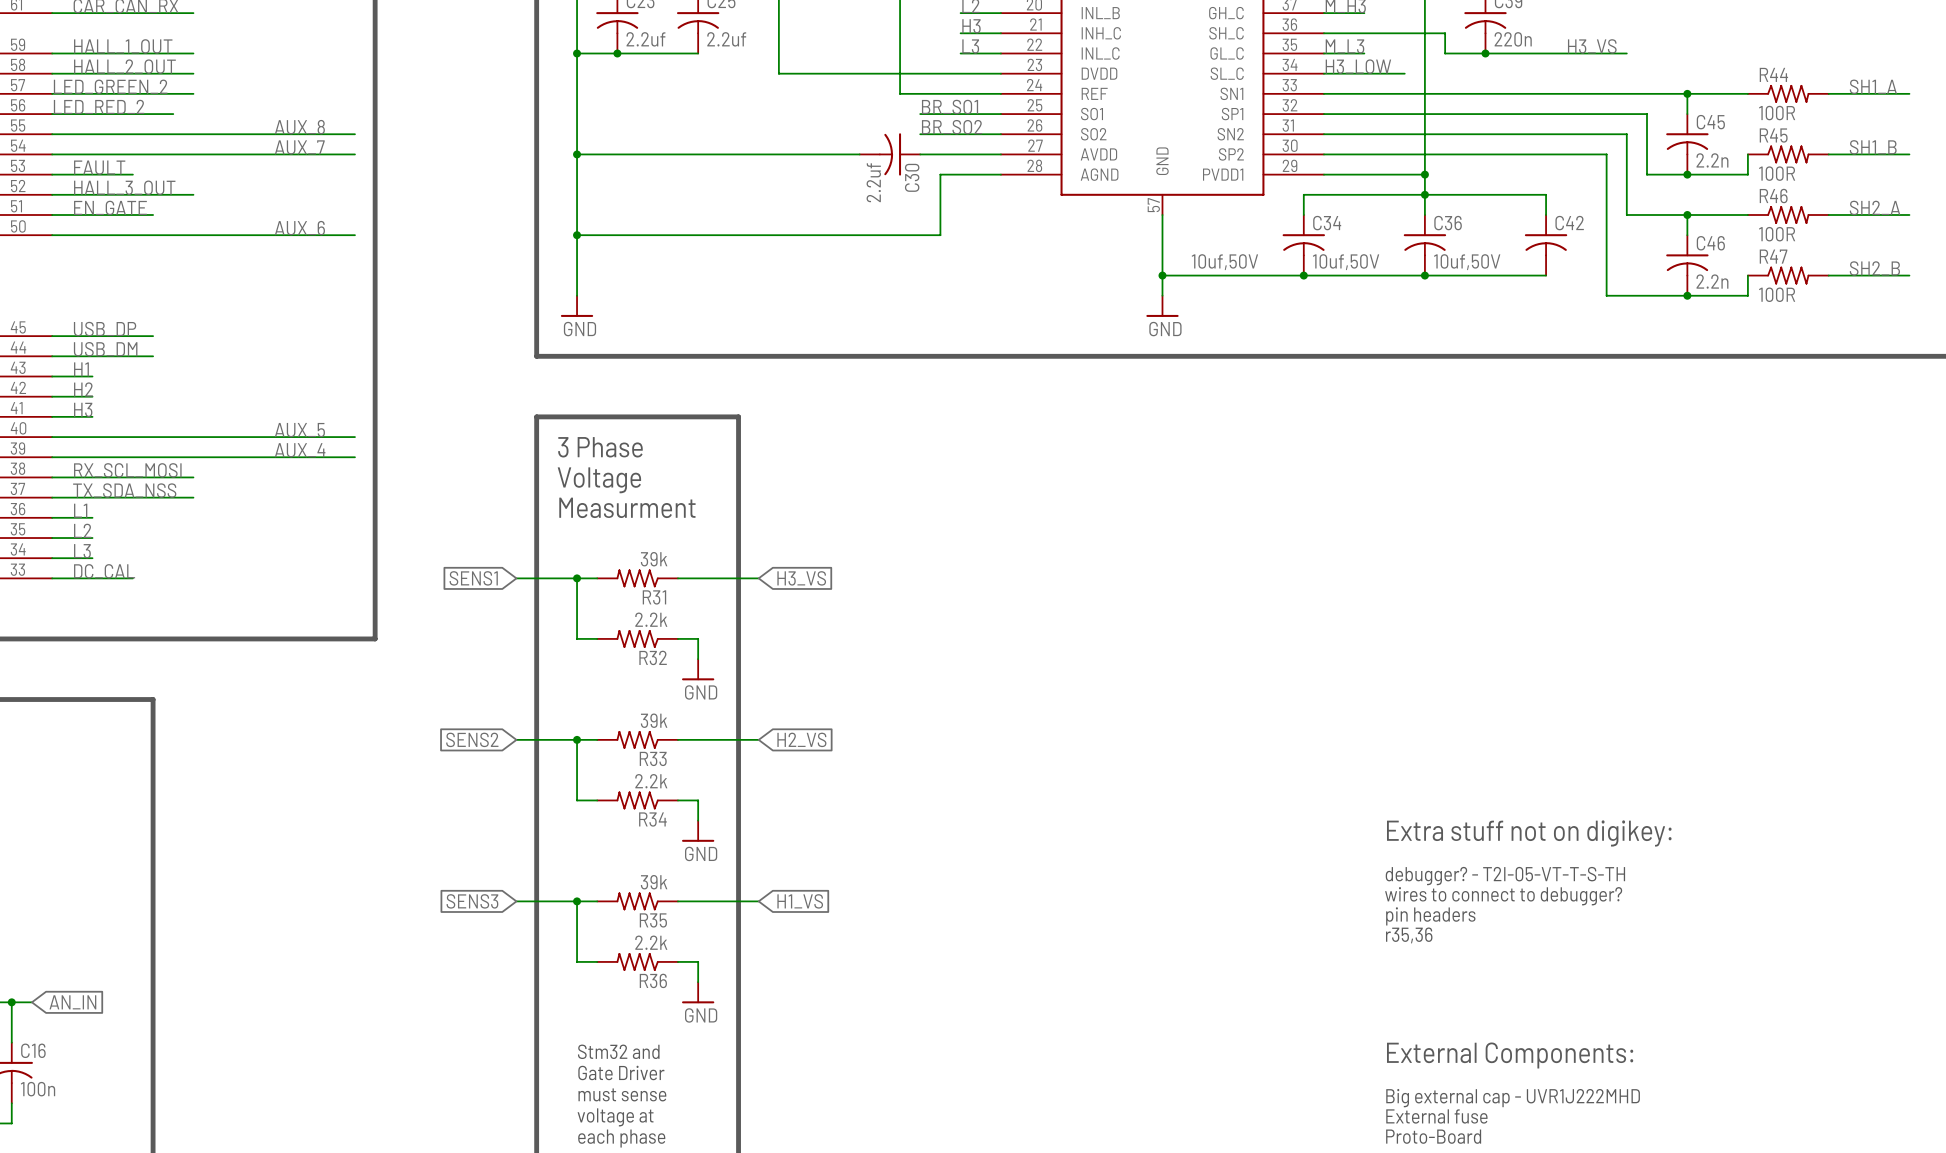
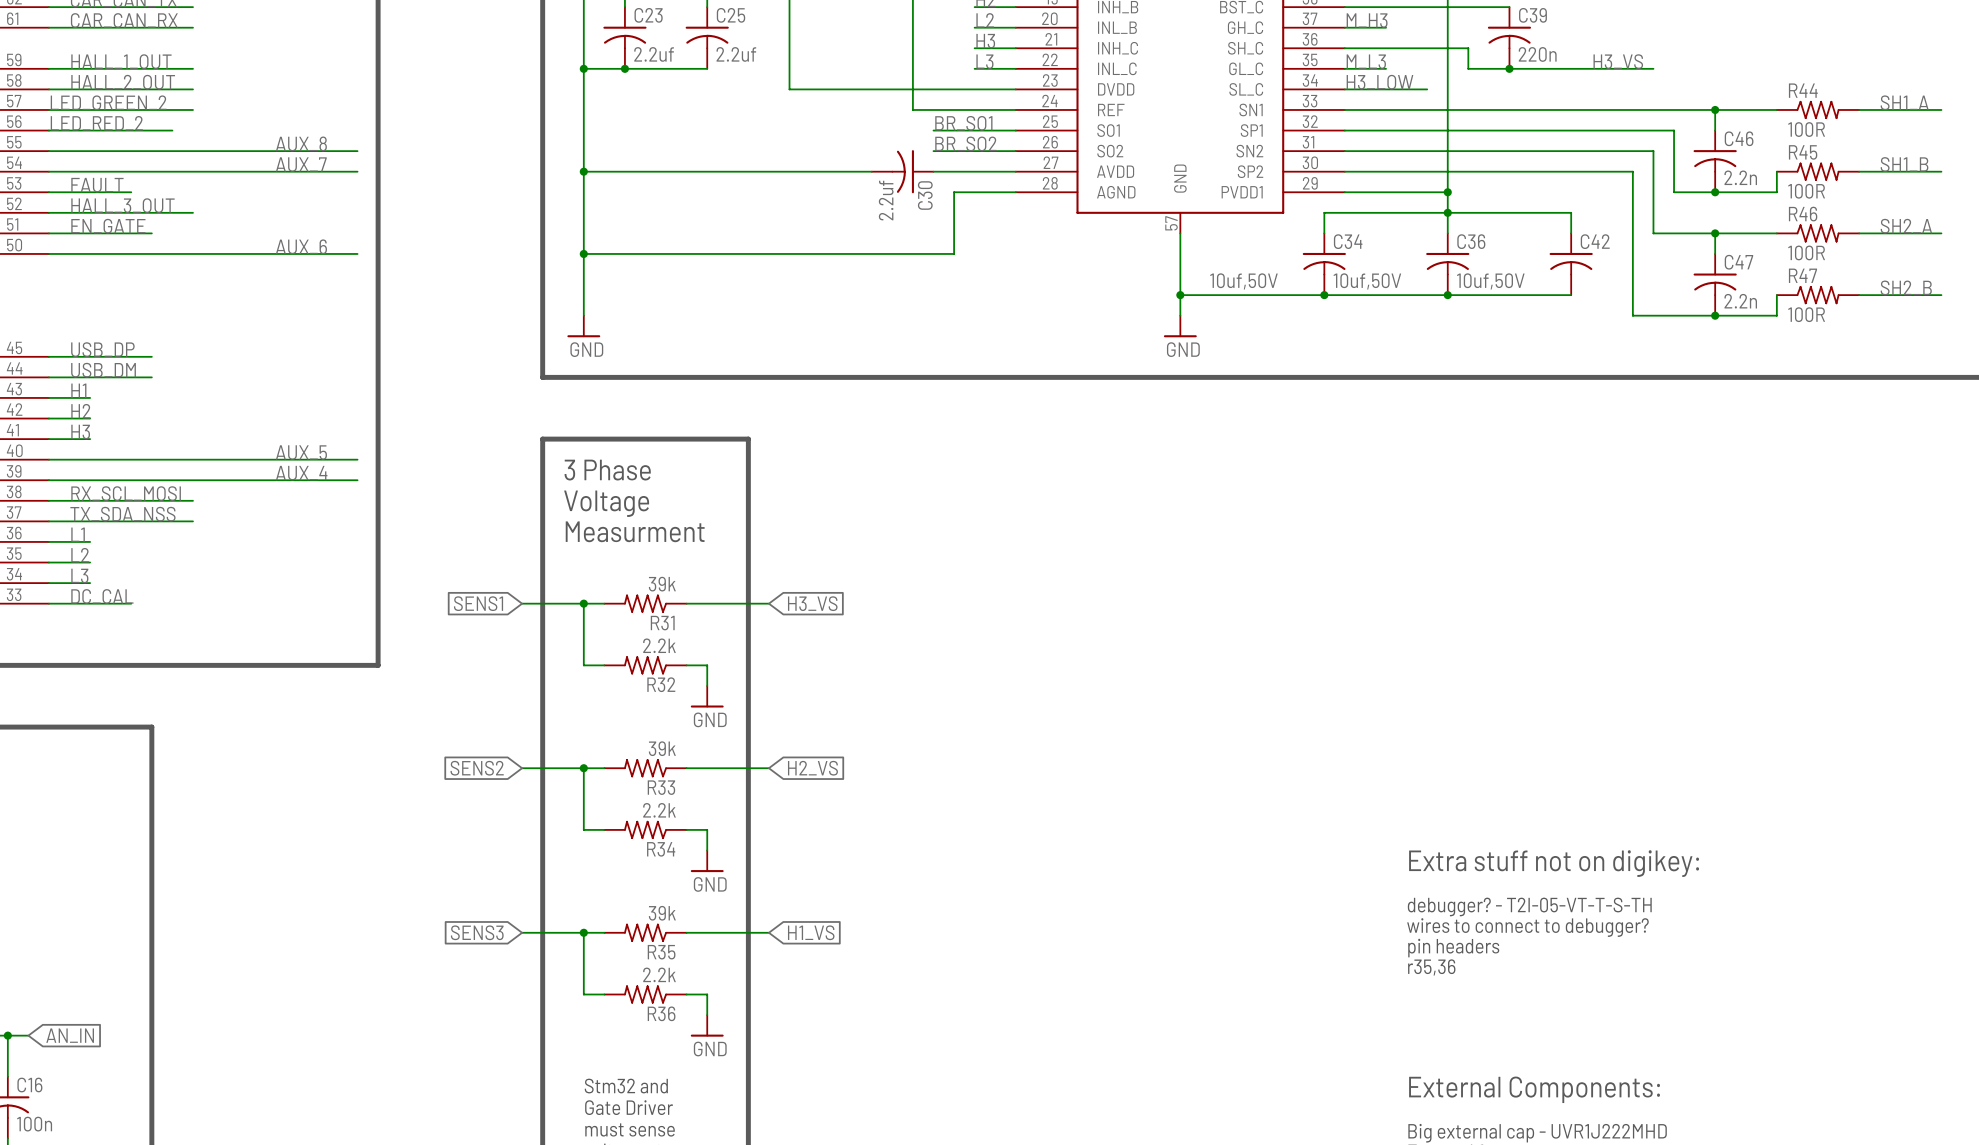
C45 name: C45 (1710, 122) -> C46 (1739, 138)
C46 name: C46 (1710, 243) -> C47 (1738, 262)

